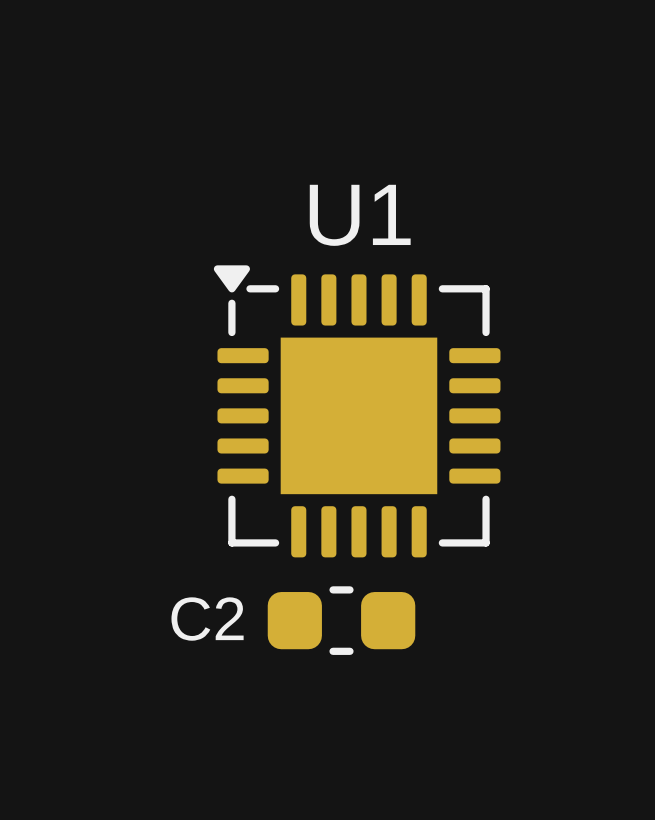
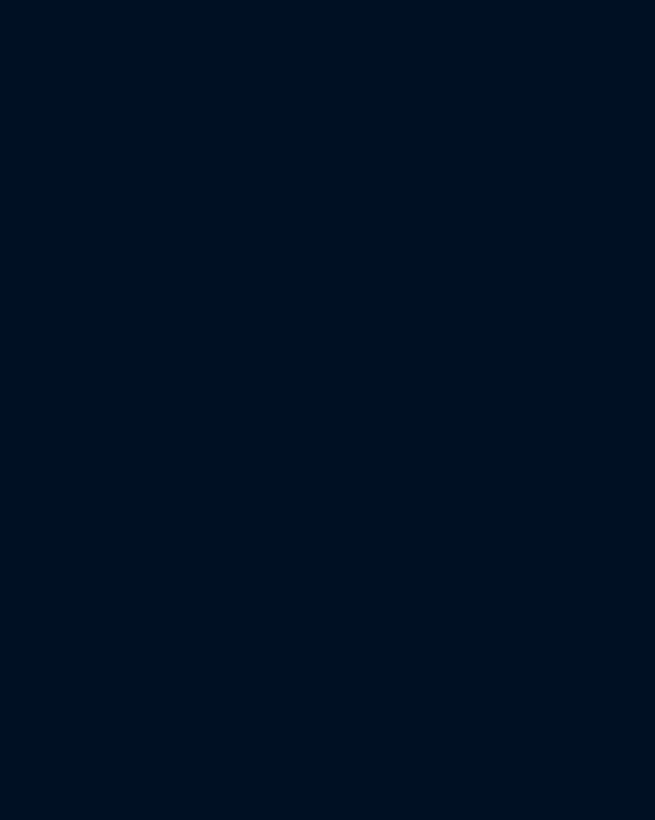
U1: (357, 411) -> none
C2: (341, 620) -> none

